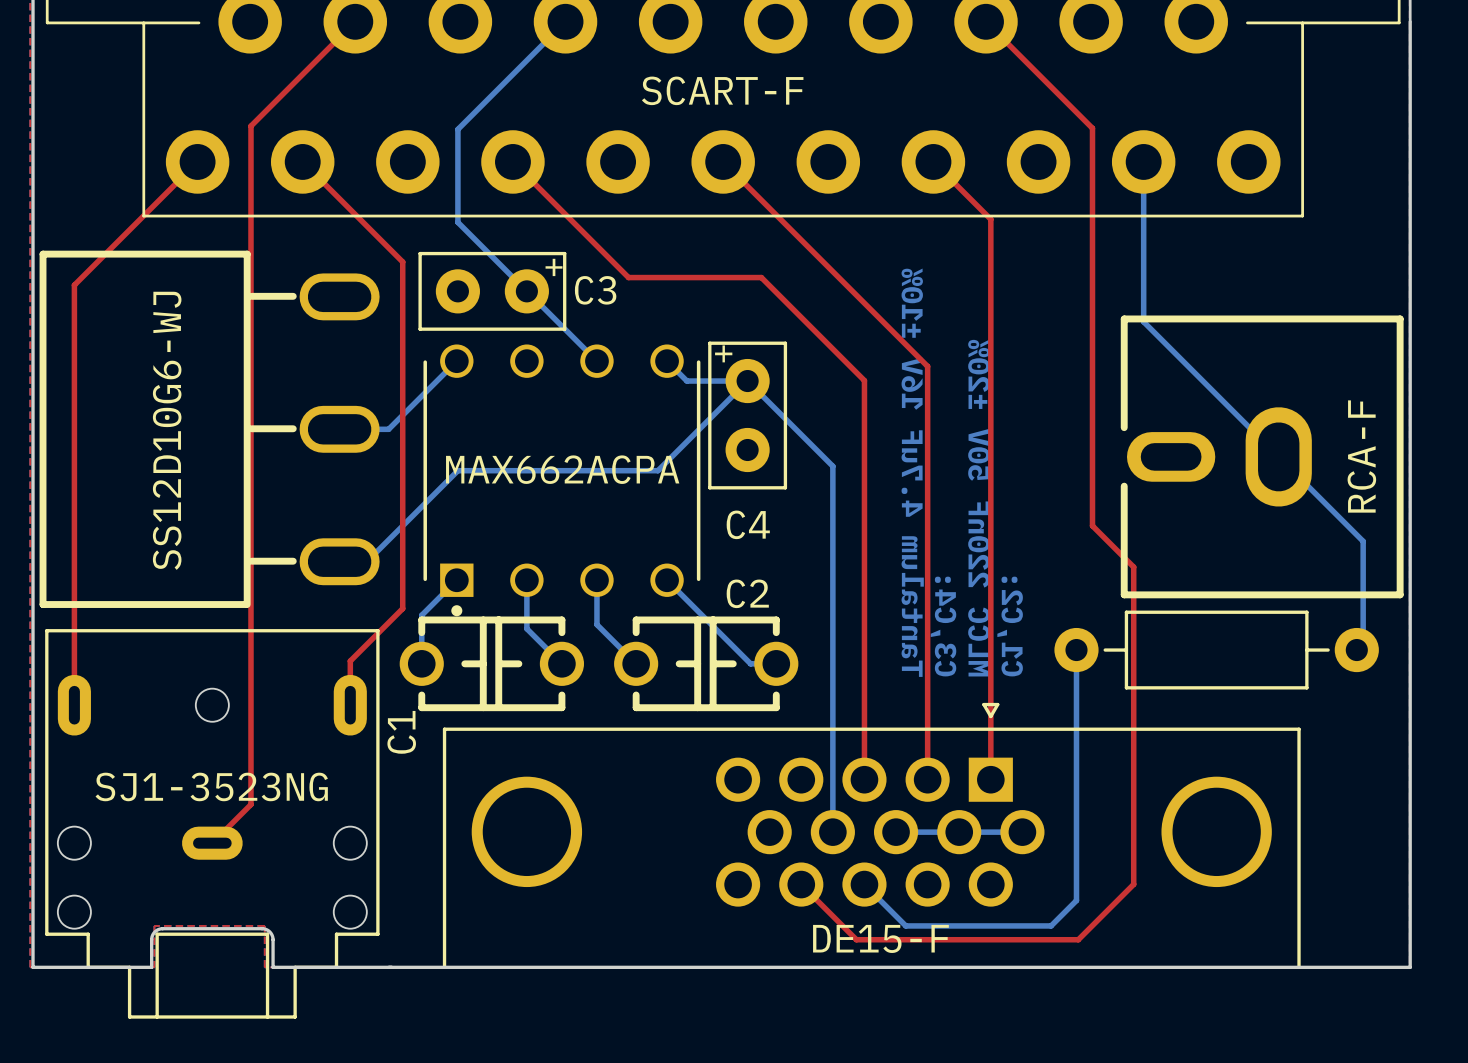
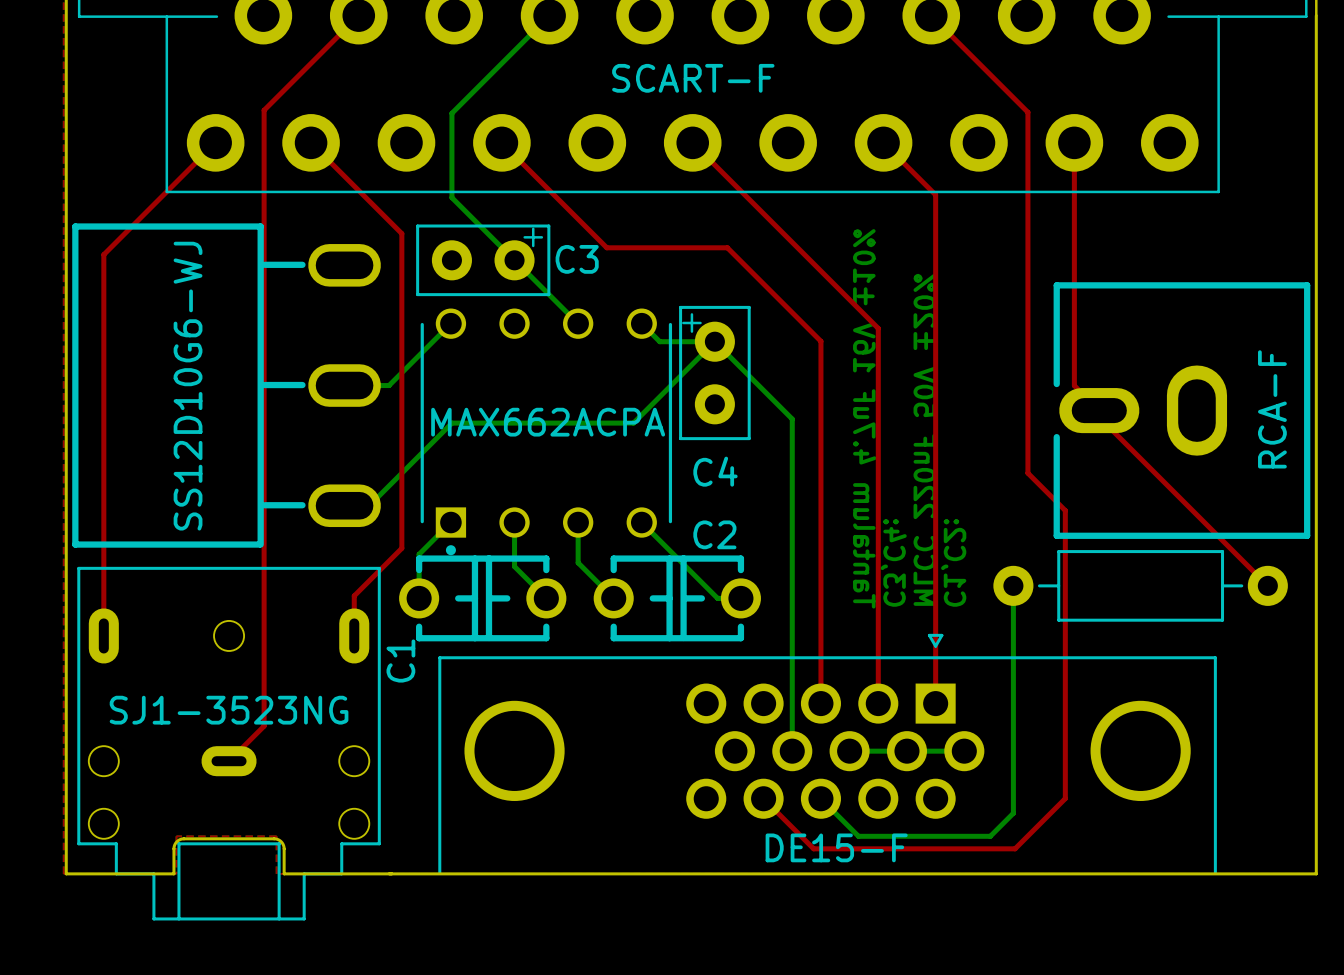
bottom track: (1143, 161) (1143, 321) (1363, 541) (1363, 650) -> none
top track: none -> (1074, 142) (1074, 385) (1099, 410) (1099, 417) (1267, 585)

